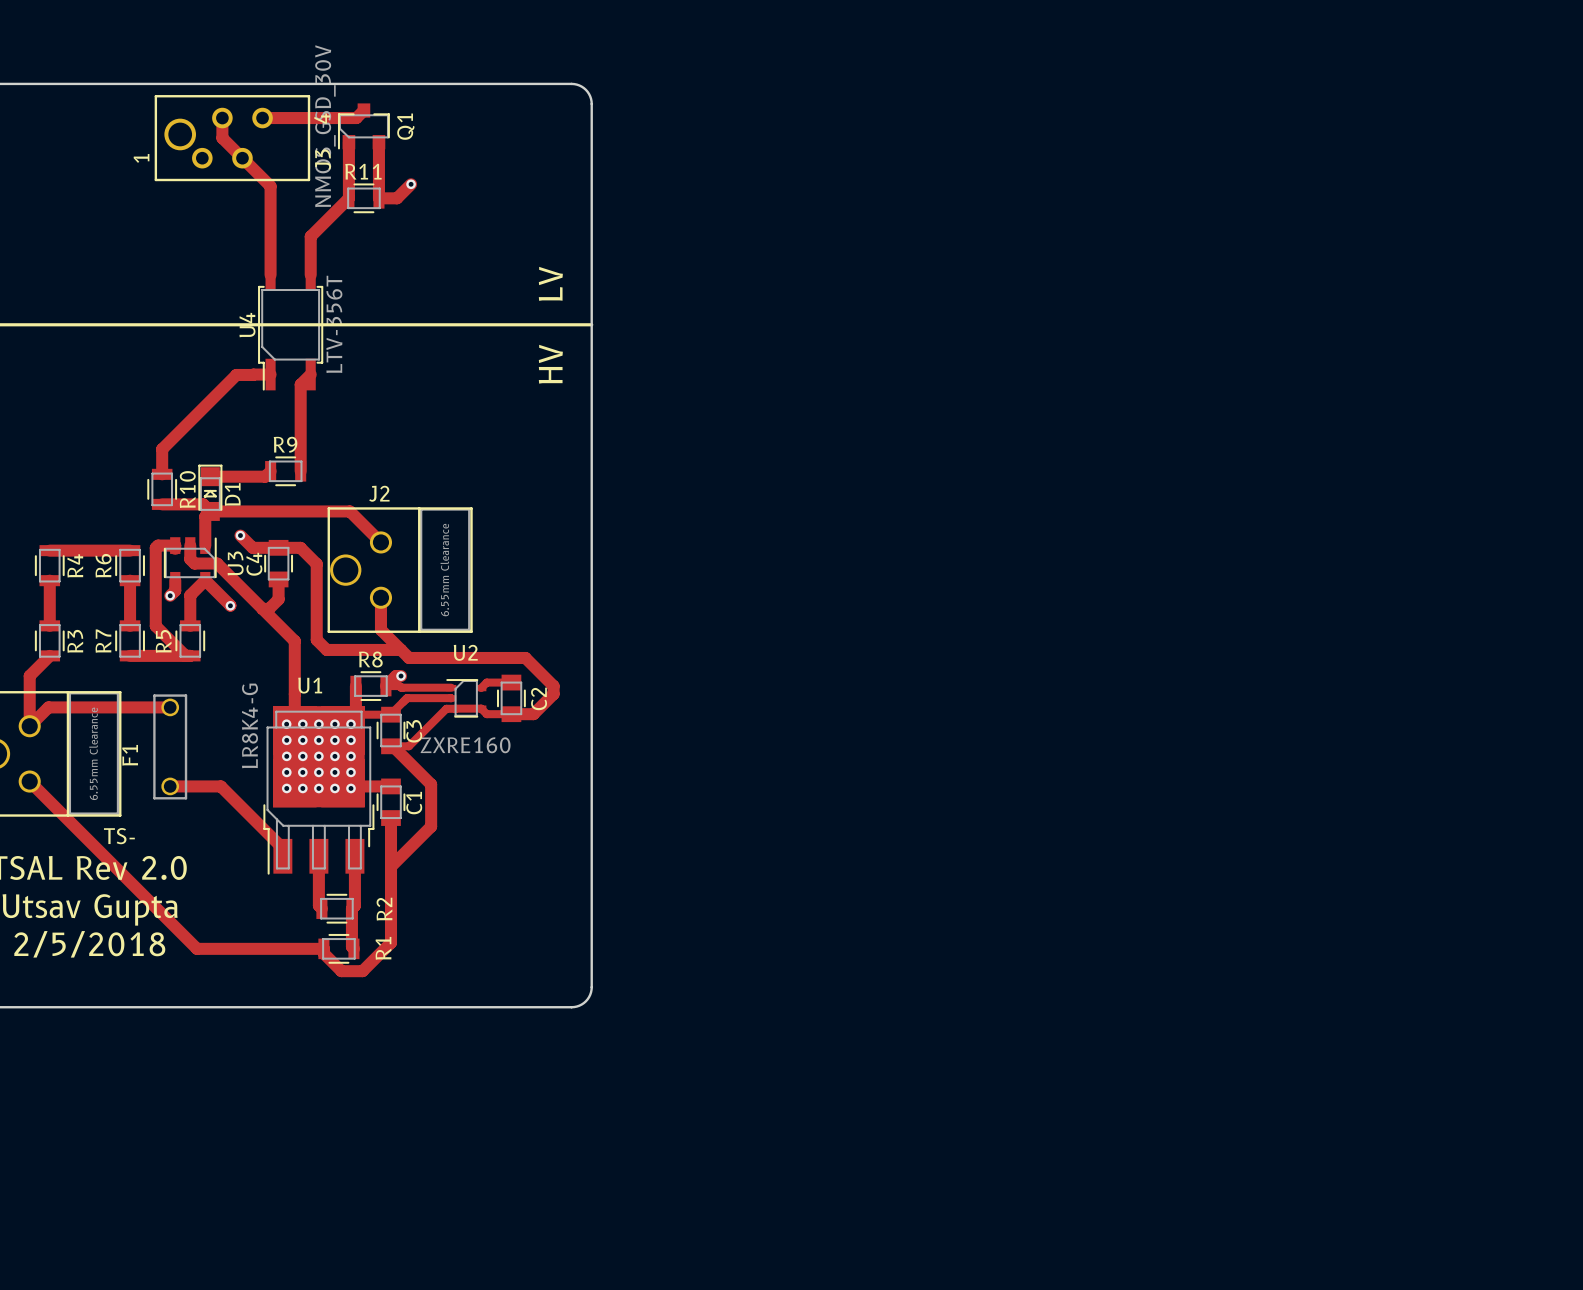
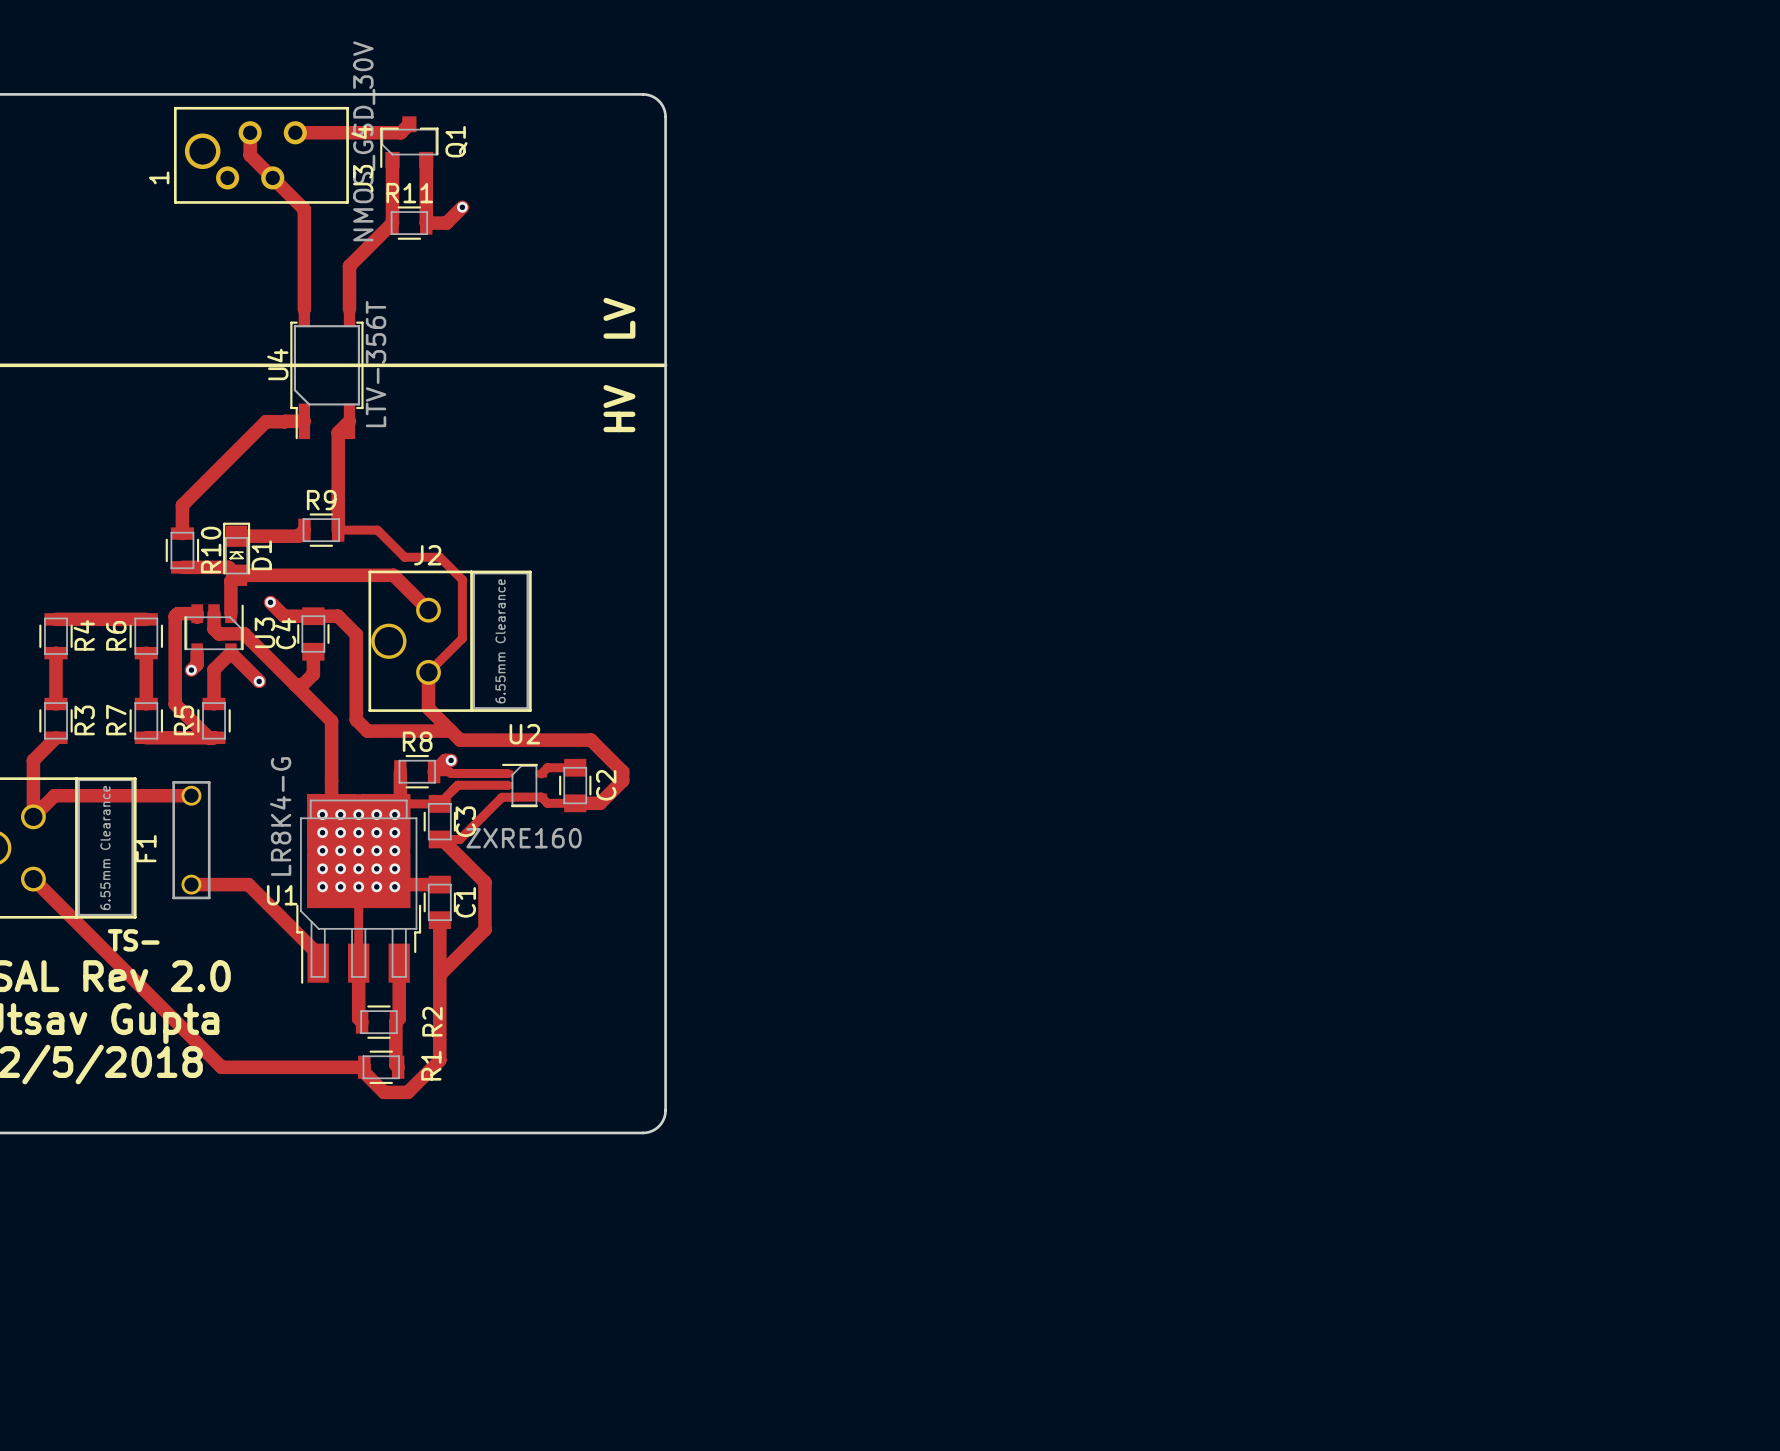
track: none -> (338, 530) (377, 530) (404, 557) (439, 557) (462, 579) (462, 638) (428, 672)
U1 name position: U1 (310, 685) -> U1 (282, 895)
track: none -> (358, 886) (358, 963)

